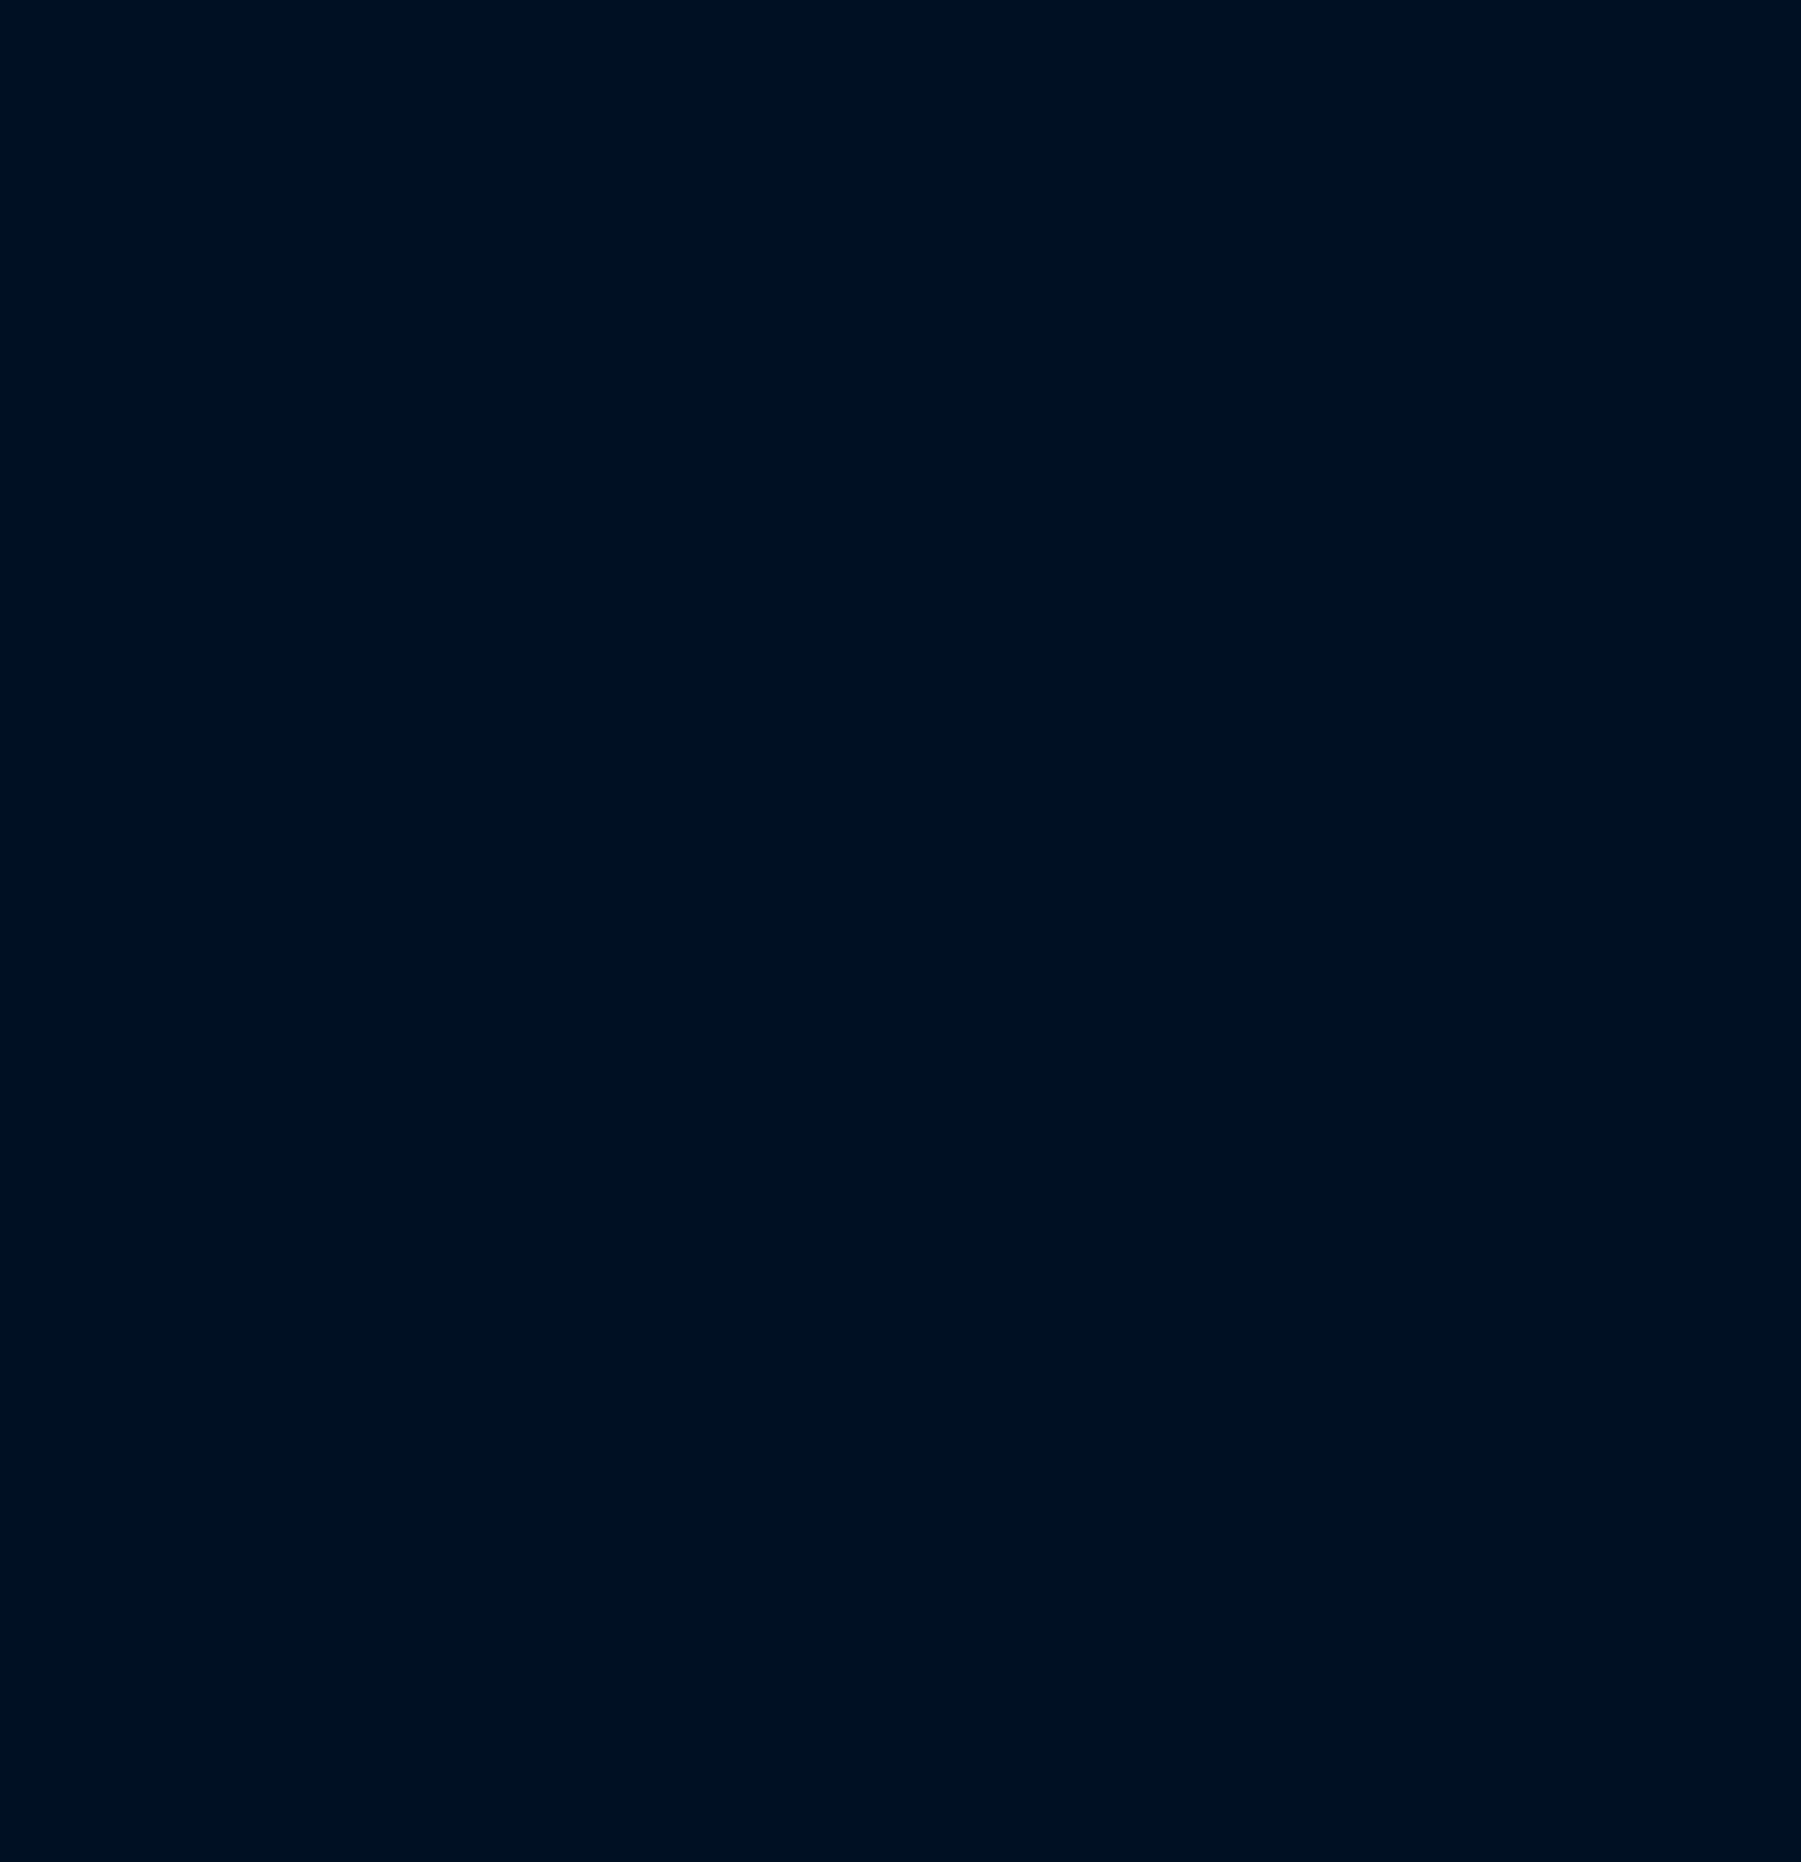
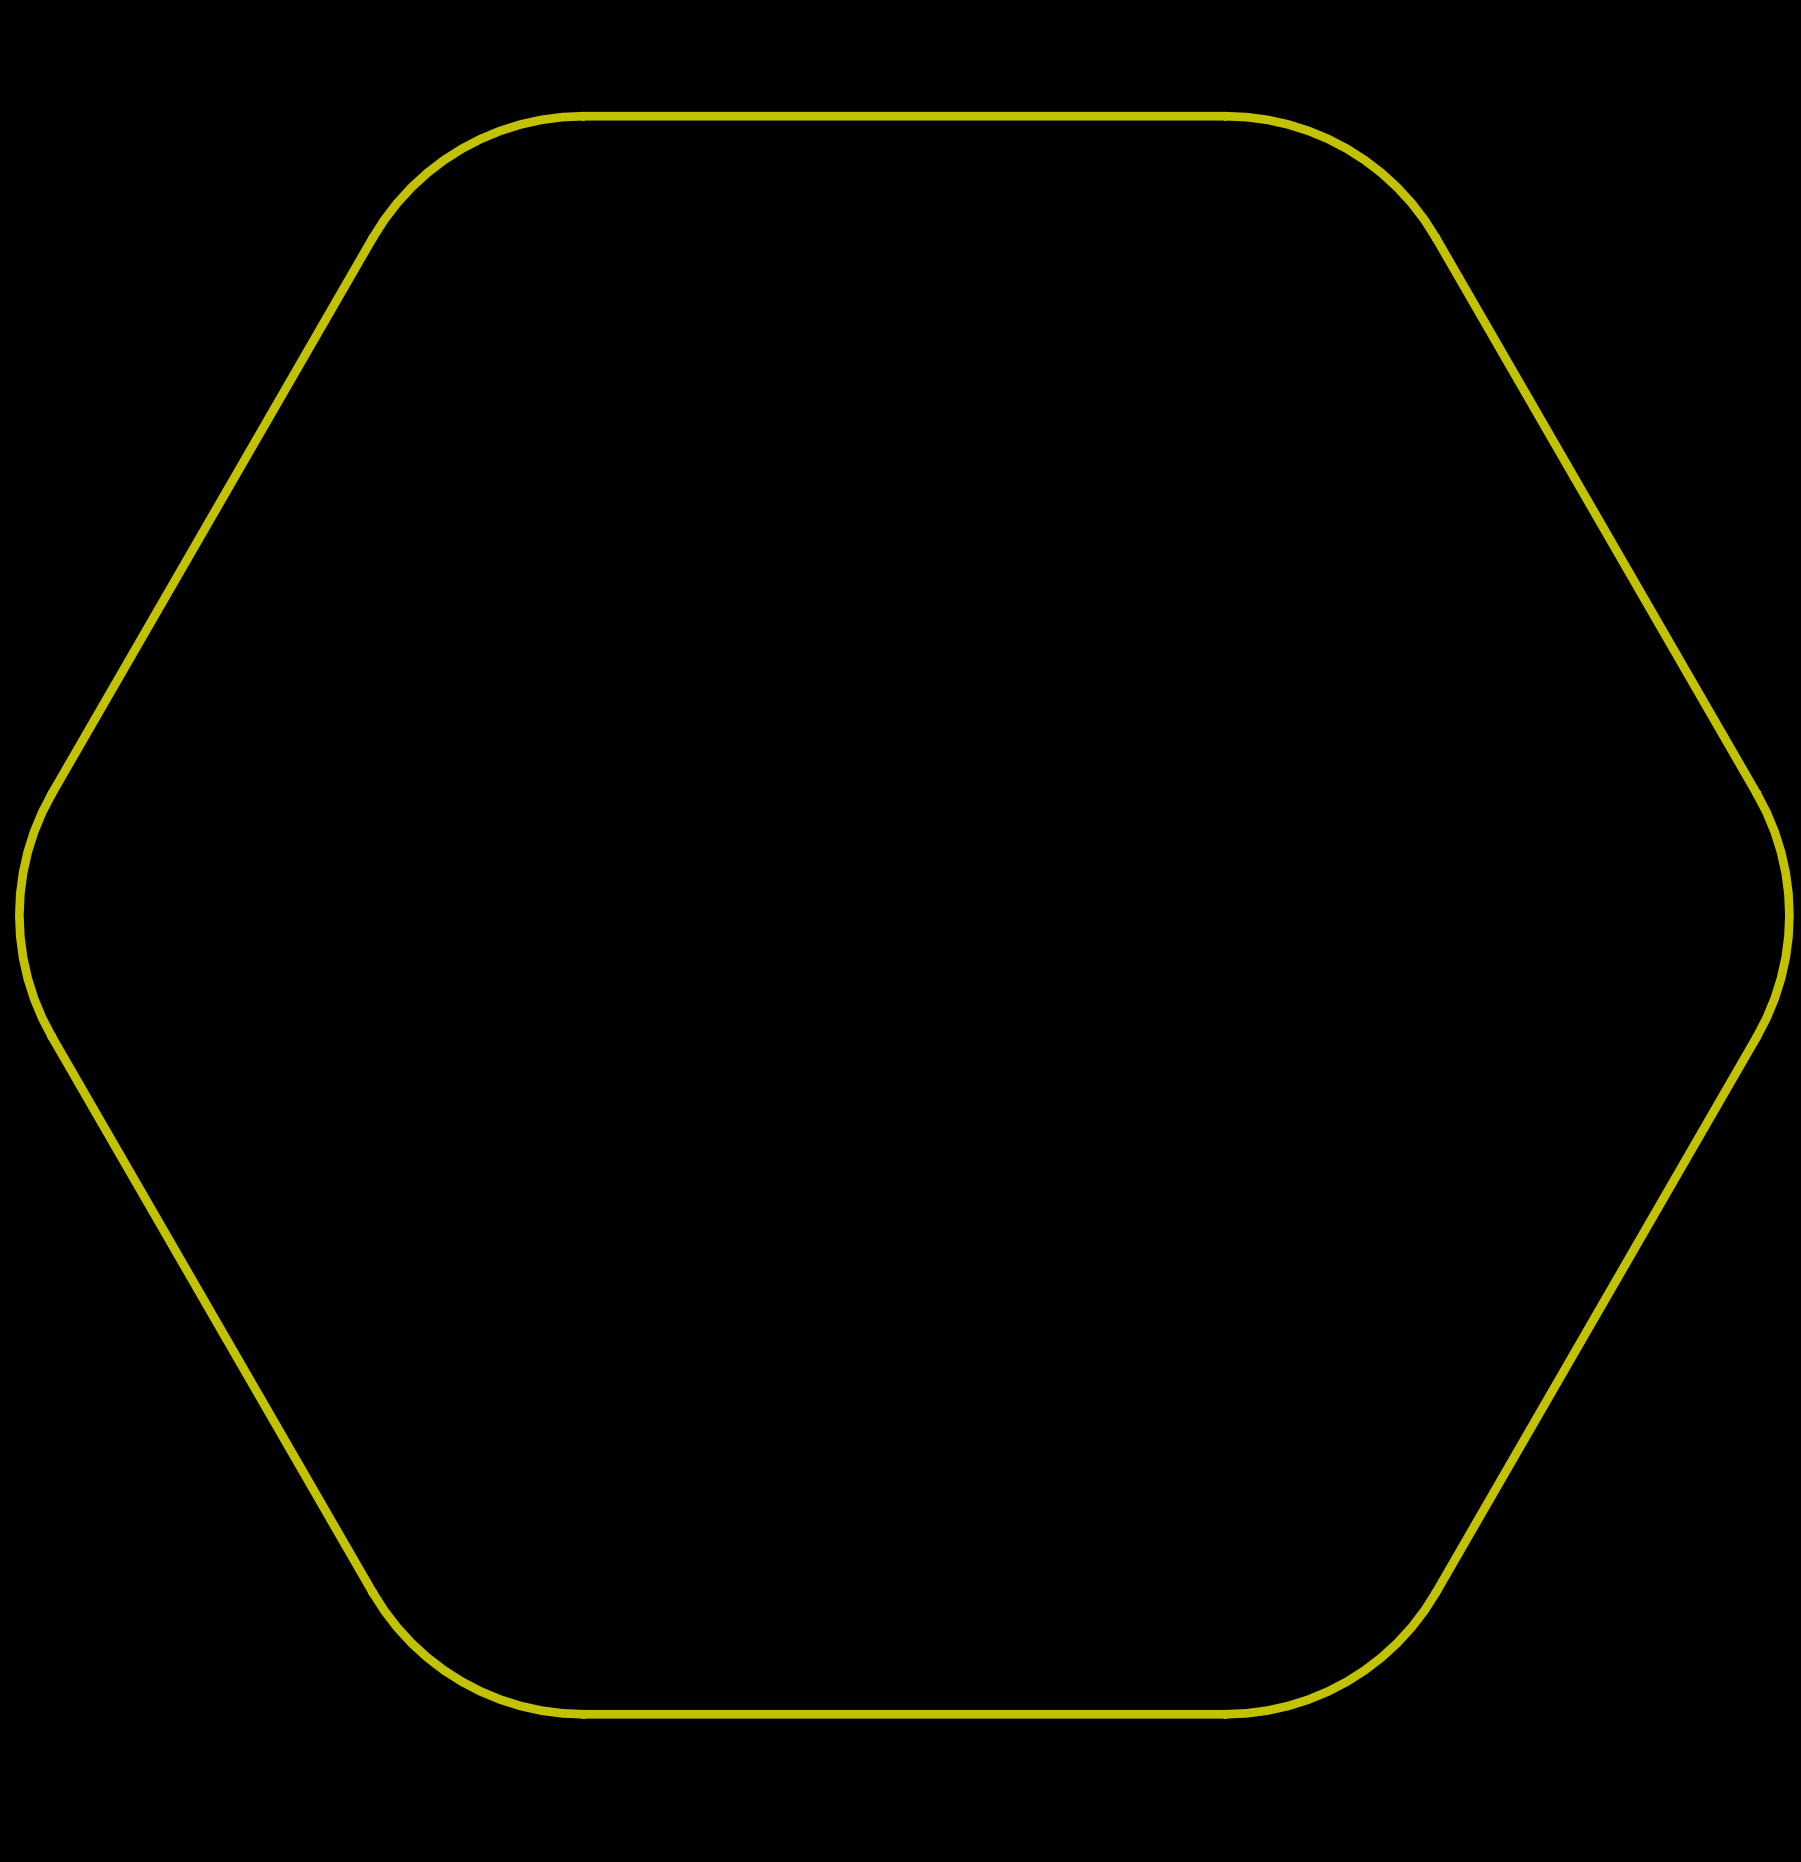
board edge: none -> (583, 116) (1225, 116) (1267, 119) (1288, 124) (1308, 130) (1346, 148) (1381, 173) (1397, 187) (1424, 219) (1435, 237) (1766, 812) (1781, 852) (1785, 873) (1789, 915) (1785, 957) (1774, 998) (1766, 1018) (1424, 1610) (1411, 1627) (1381, 1657) (1364, 1670) (1328, 1691) (1308, 1699) (1267, 1710) (1225, 1714) (583, 1714) (562, 1713) (520, 1705) (500, 1699) (461, 1681) (427, 1657) (411, 1643) (397, 1627) (372, 1592) (42, 1018) (27, 978) (20, 936) (19, 915) (23, 873) (34, 832) (42, 812) (372, 237) (397, 203) (411, 187) (443, 160) (461, 148) (480, 138) (520, 124) (541, 119) (583, 116)

